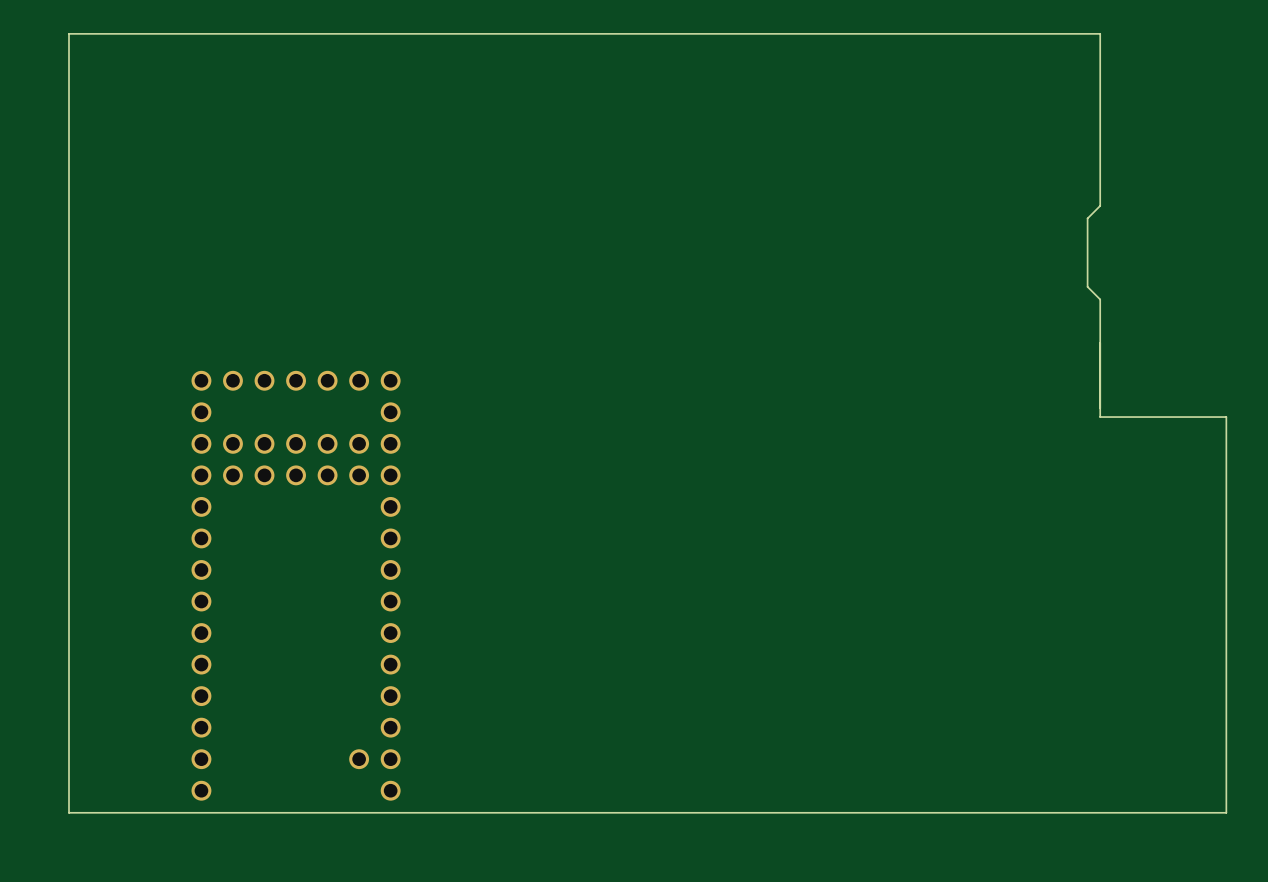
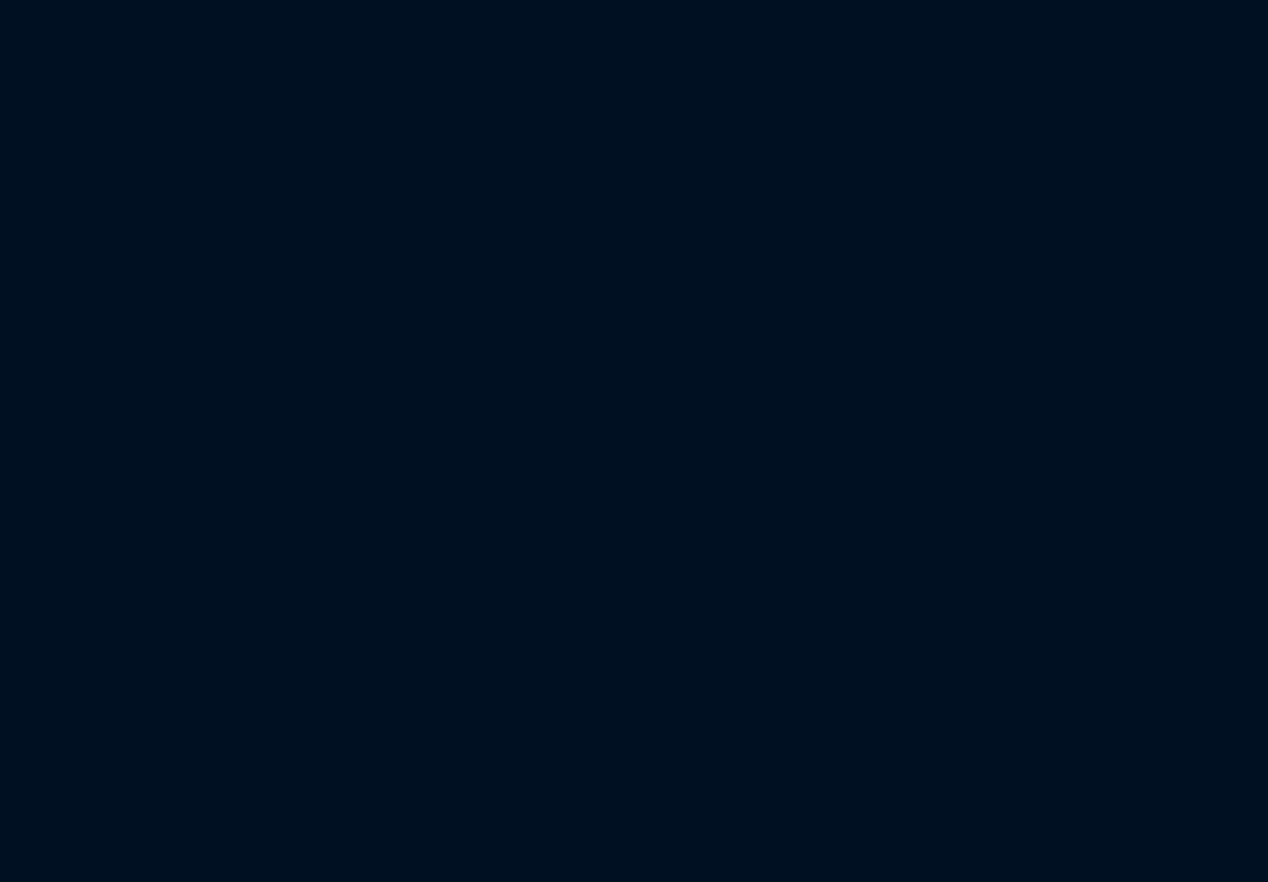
board edge: (1100, 33) (1100, 205) (1087, 218) (1087, 286) (1100, 299) (1100, 417) (1226, 417) (1226, 812) (69, 812) (69, 33) (1100, 33) -> none
part: (296, 585) -> none

